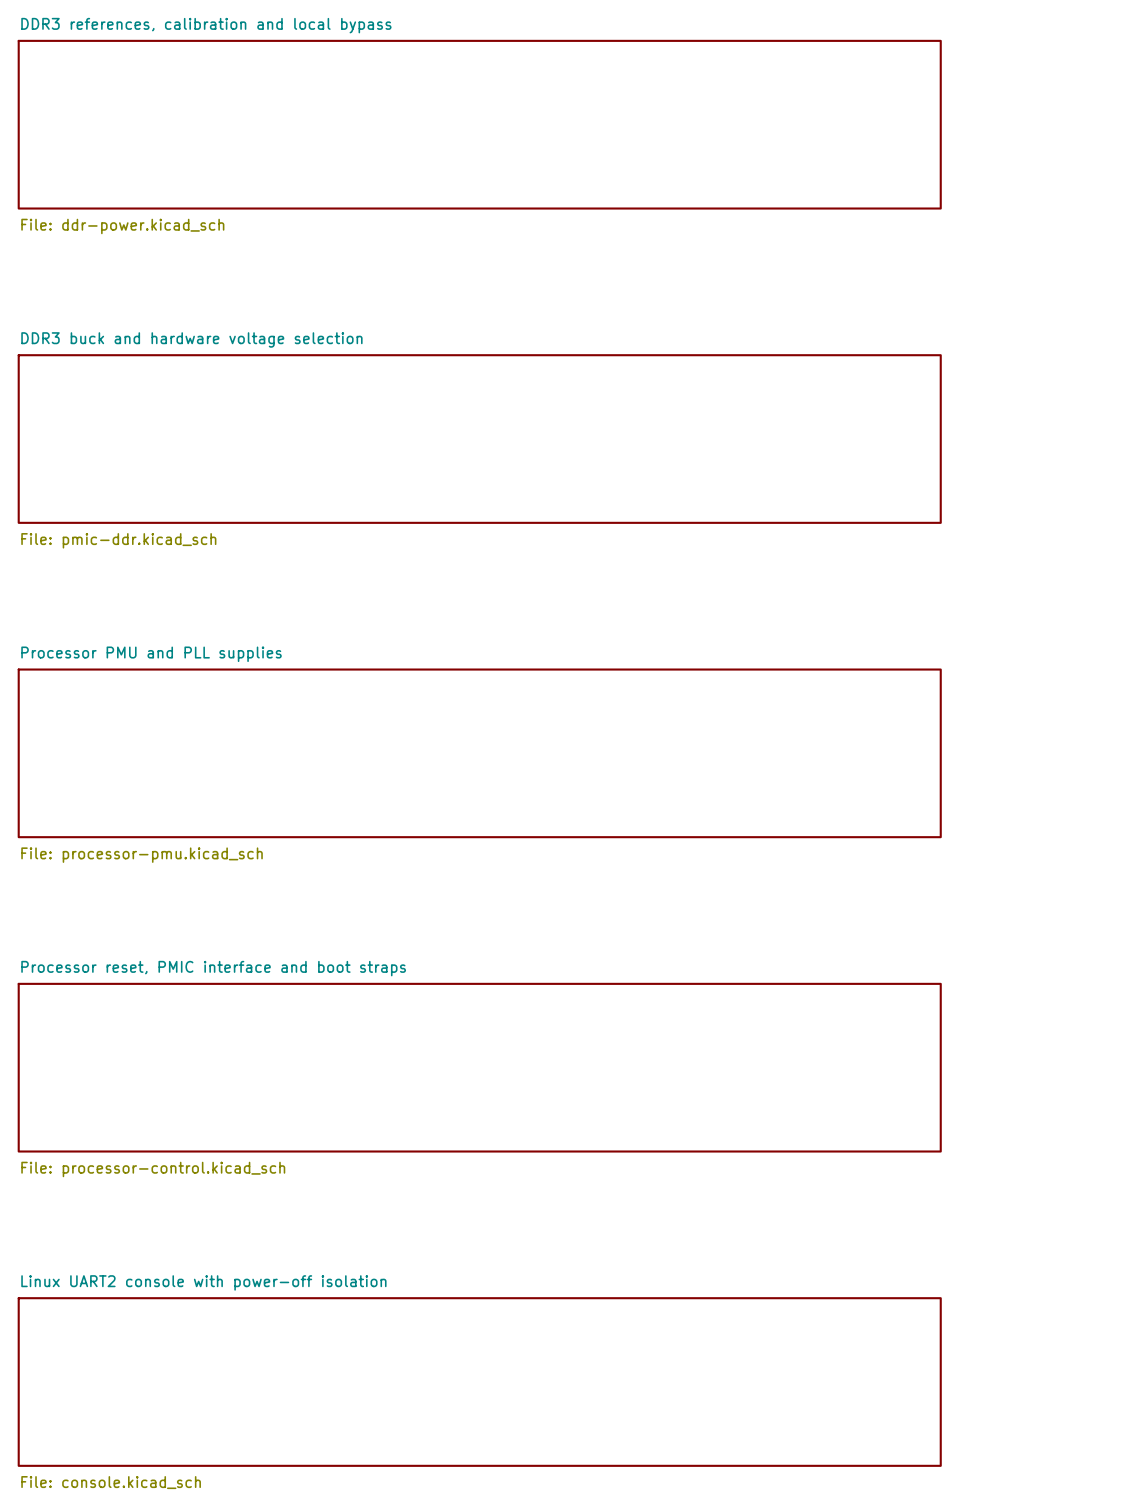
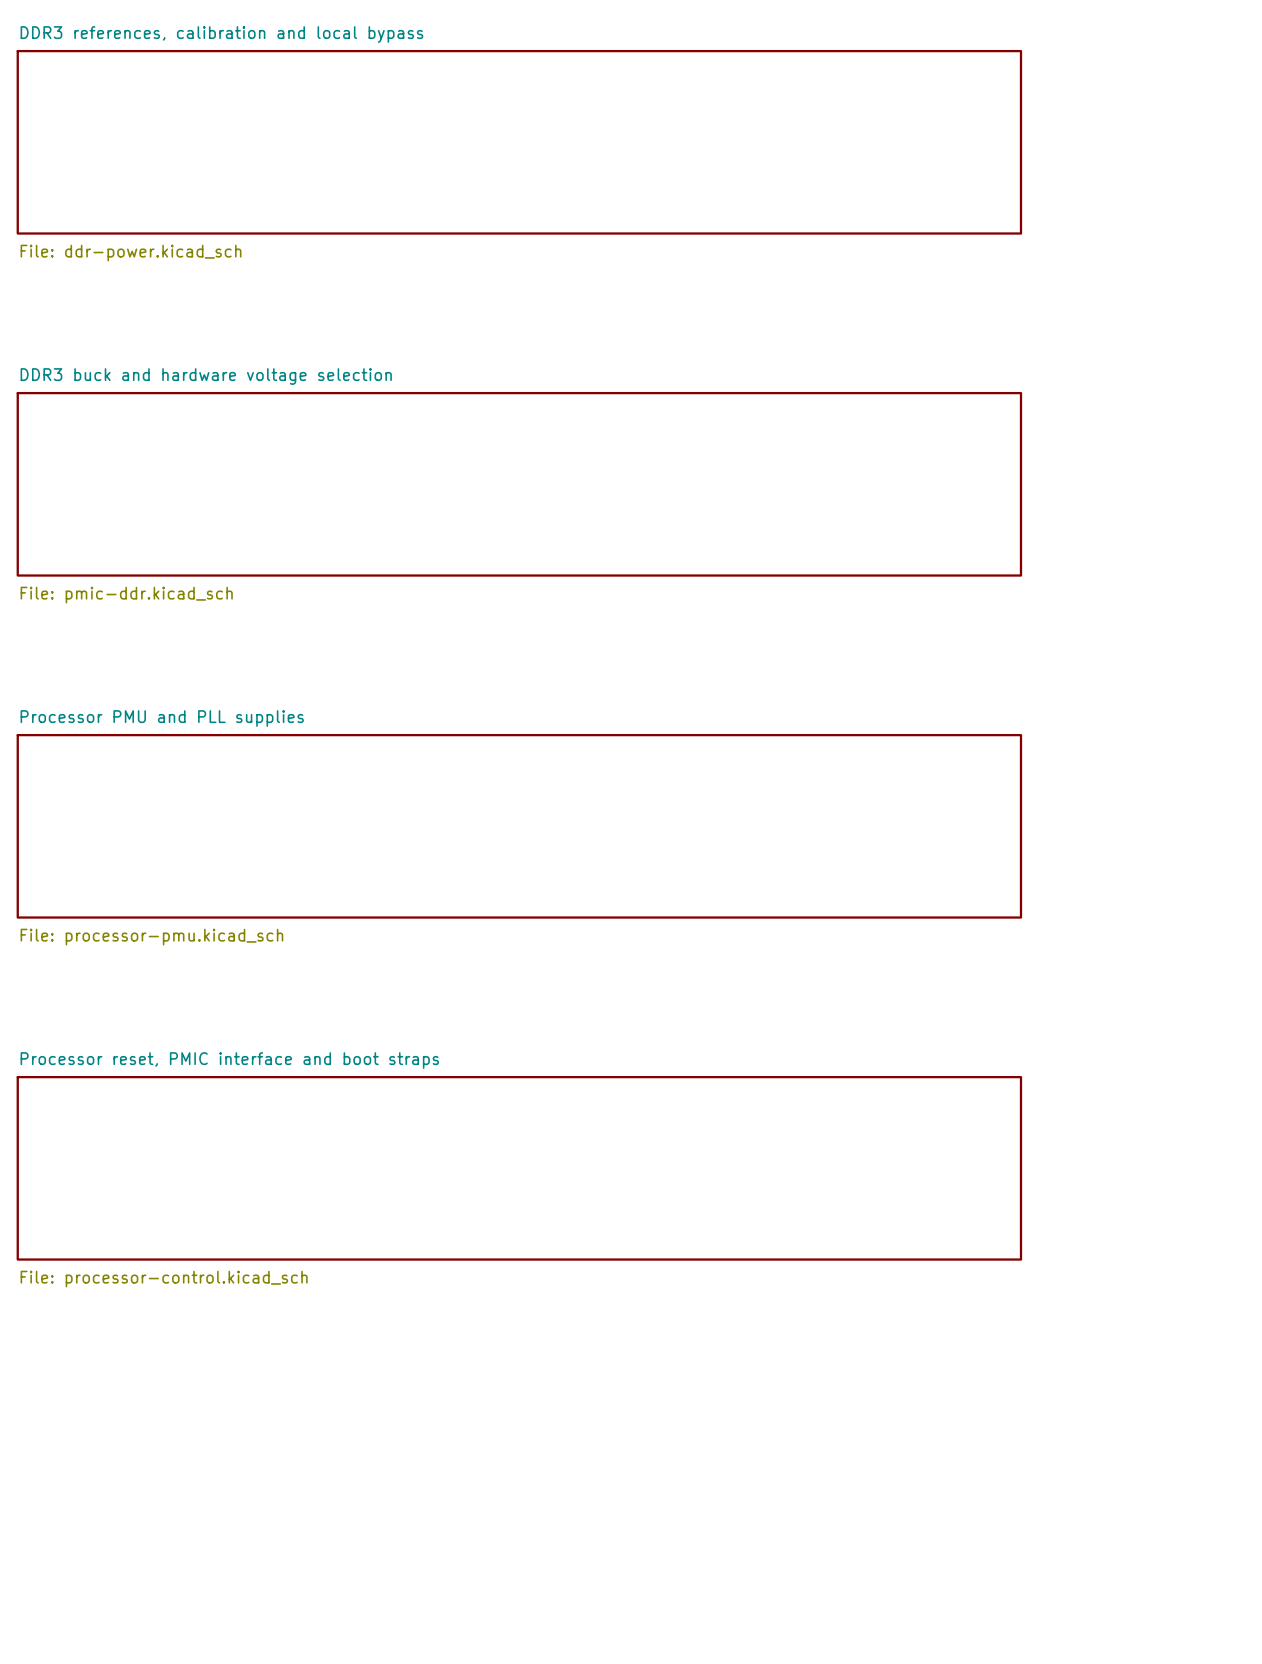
sheet Linux UART2 console with power-off isolation: File: console.kicad_sch (479, 1382) -> none

